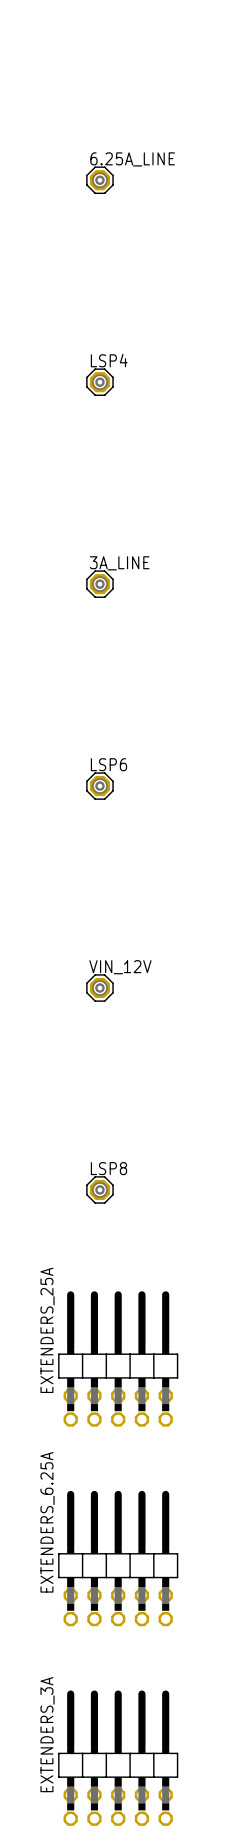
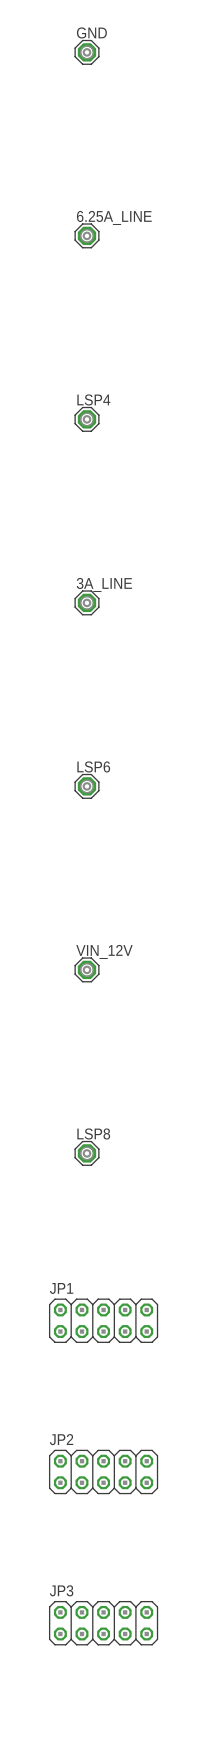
EXTENDERS_25A: (118, 1358) -> none
JP1: none -> (103, 1320)
JP2: none -> (103, 1471)
EXTENDERS_6.25A: (118, 1558) -> none
JP3: none -> (103, 1623)
EXTENDERS_3A: (118, 1758) -> none

